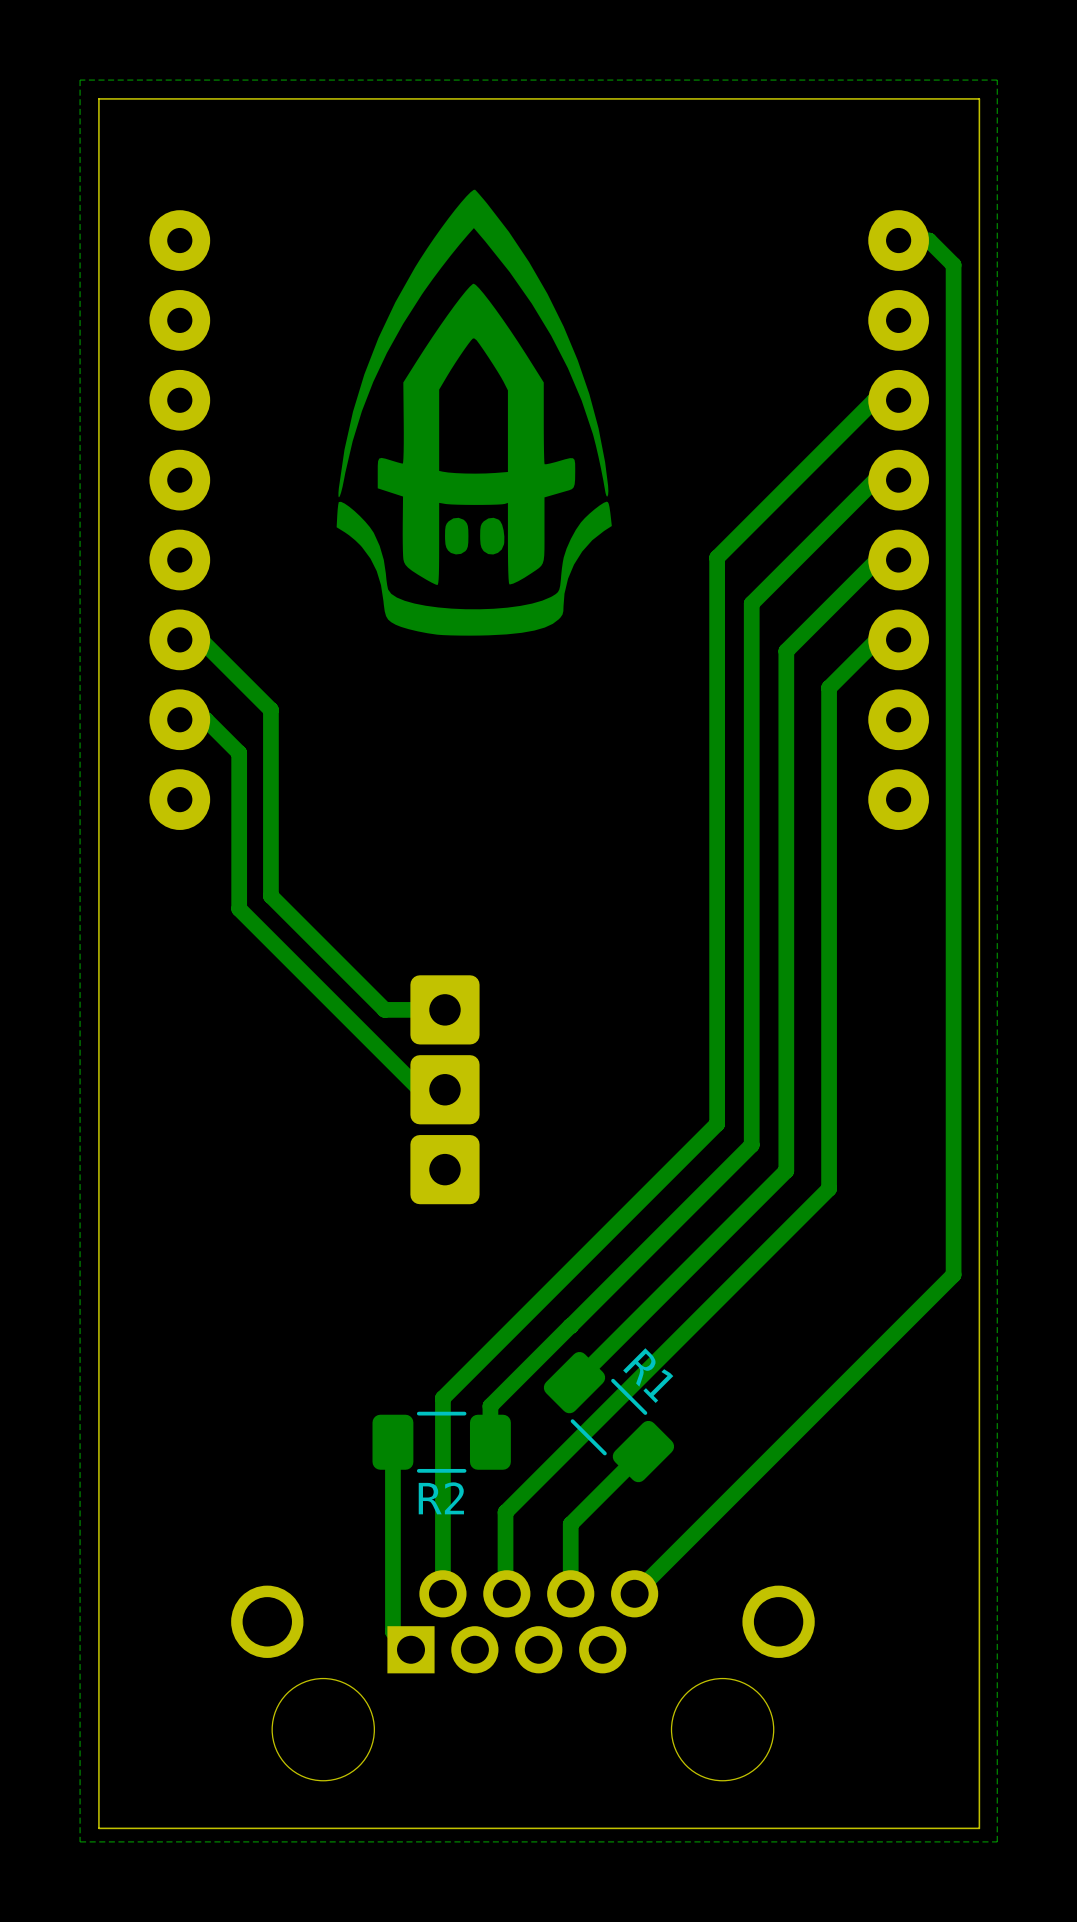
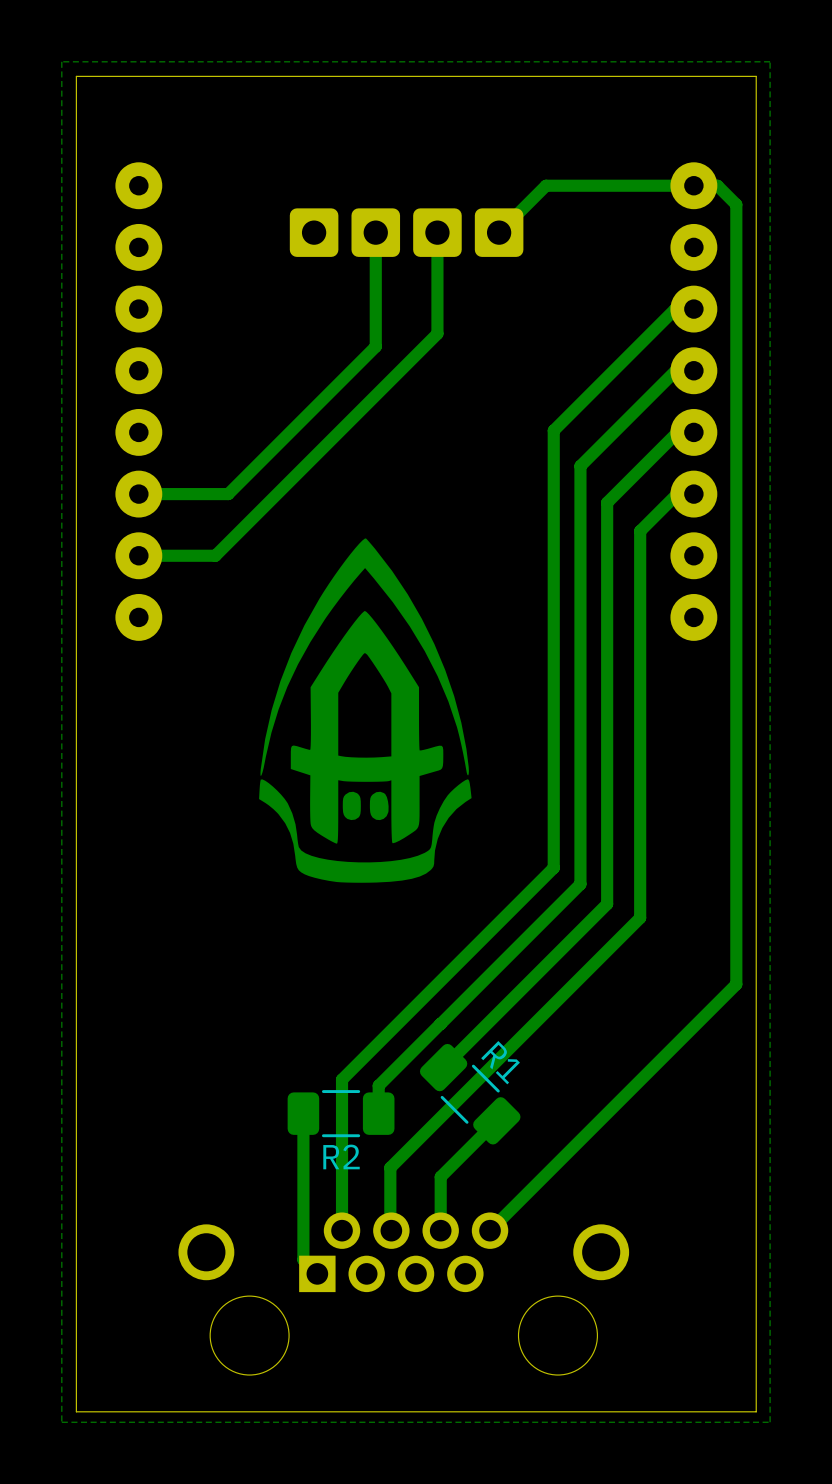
track: none -> (693, 185) (546, 185) (499, 232)
part: none -> (406, 232)
drawing position: (474, 412) -> (365, 710)
track: (200, 639) (270, 709) (270, 896) (384, 1009) (462, 1009) -> (155, 494) (228, 494) (375, 346) (375, 232)
track: (205, 719) (239, 752) (239, 908) (419, 1089) (462, 1089) -> (159, 555) (215, 555) (437, 333) (437, 232)
part: (444, 1089) -> none

